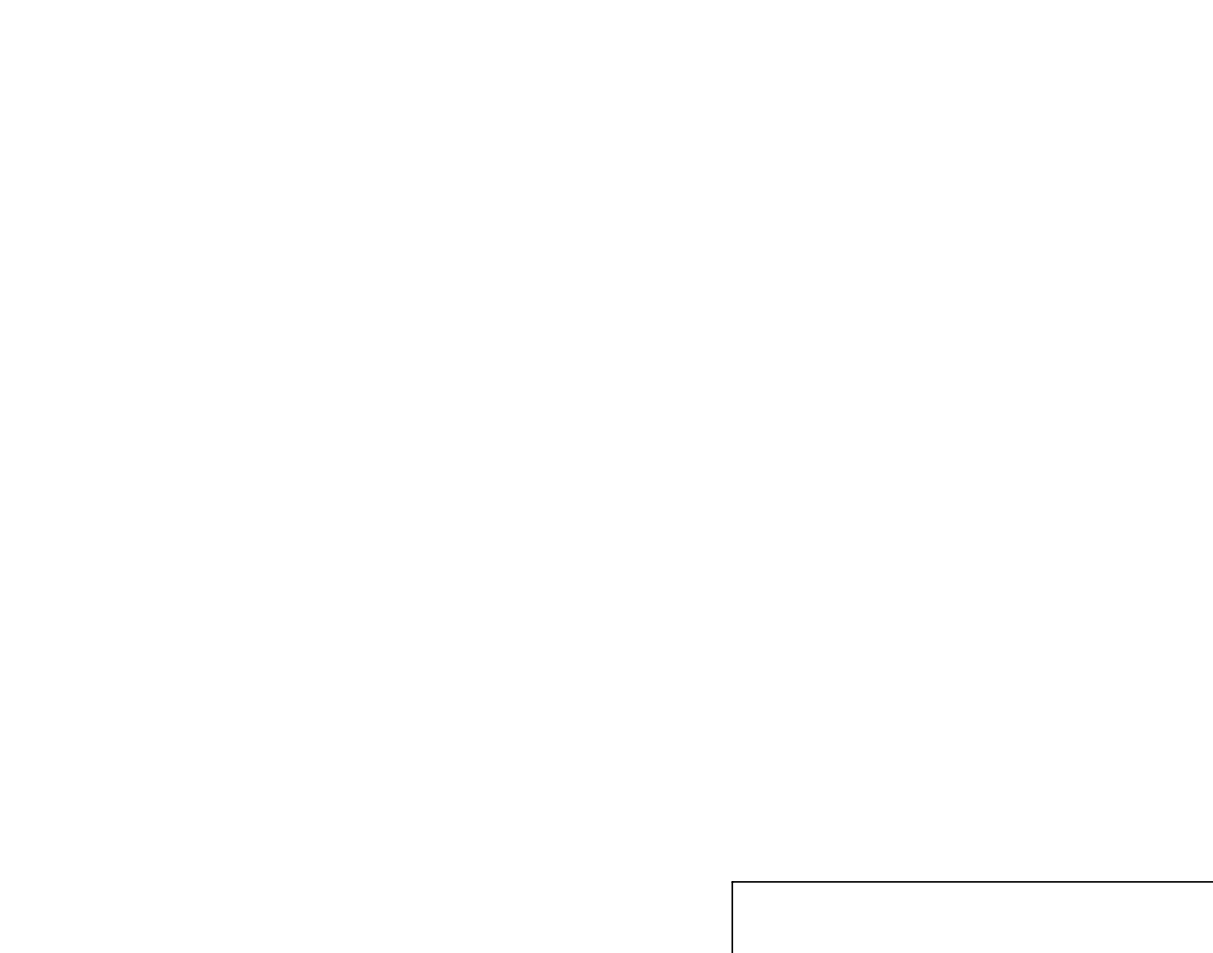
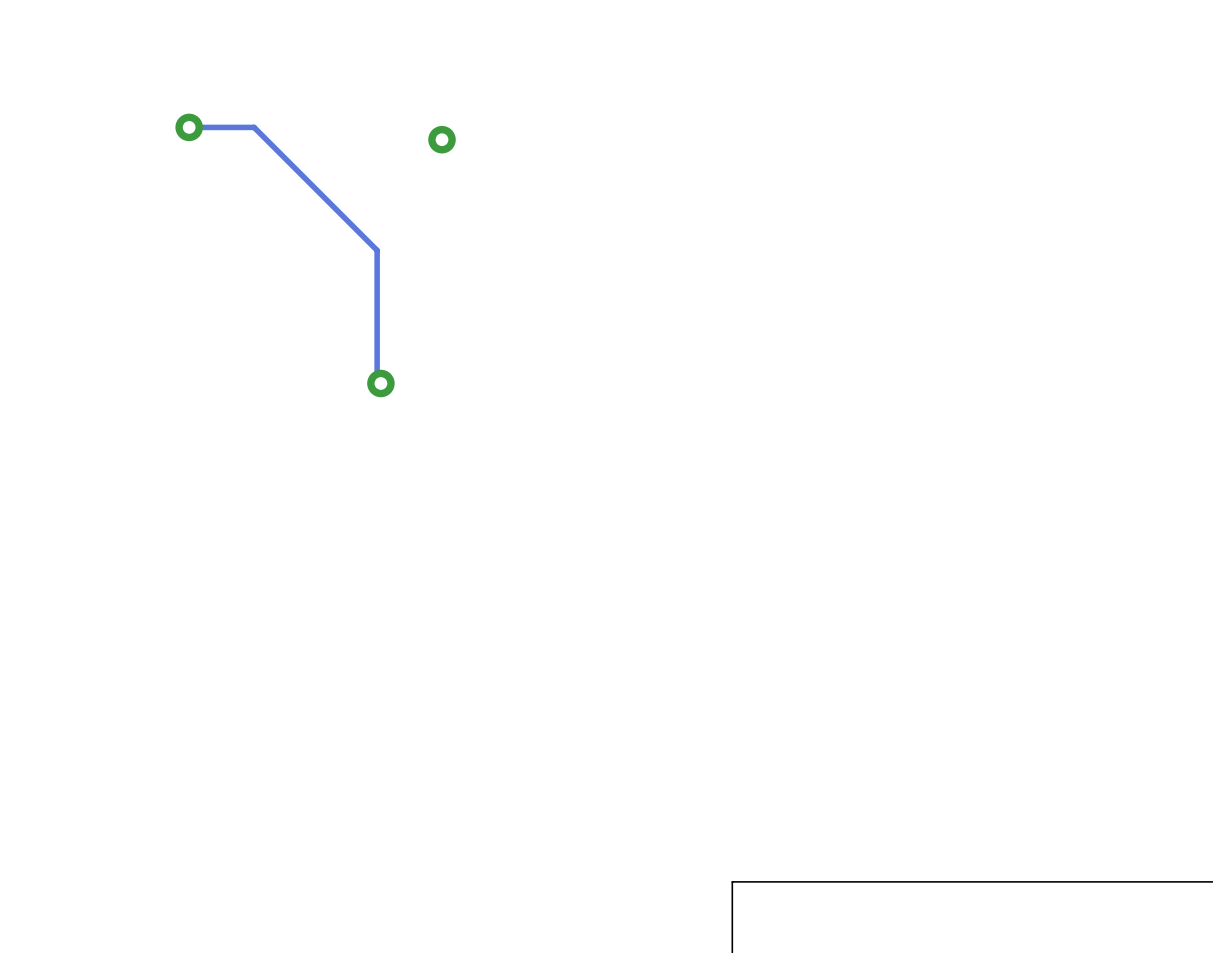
track: none -> (189, 127) (254, 127) (377, 250) (377, 379) (380, 383)
via: none -> (189, 127)
via: none -> (442, 139)
via: none -> (380, 383)

